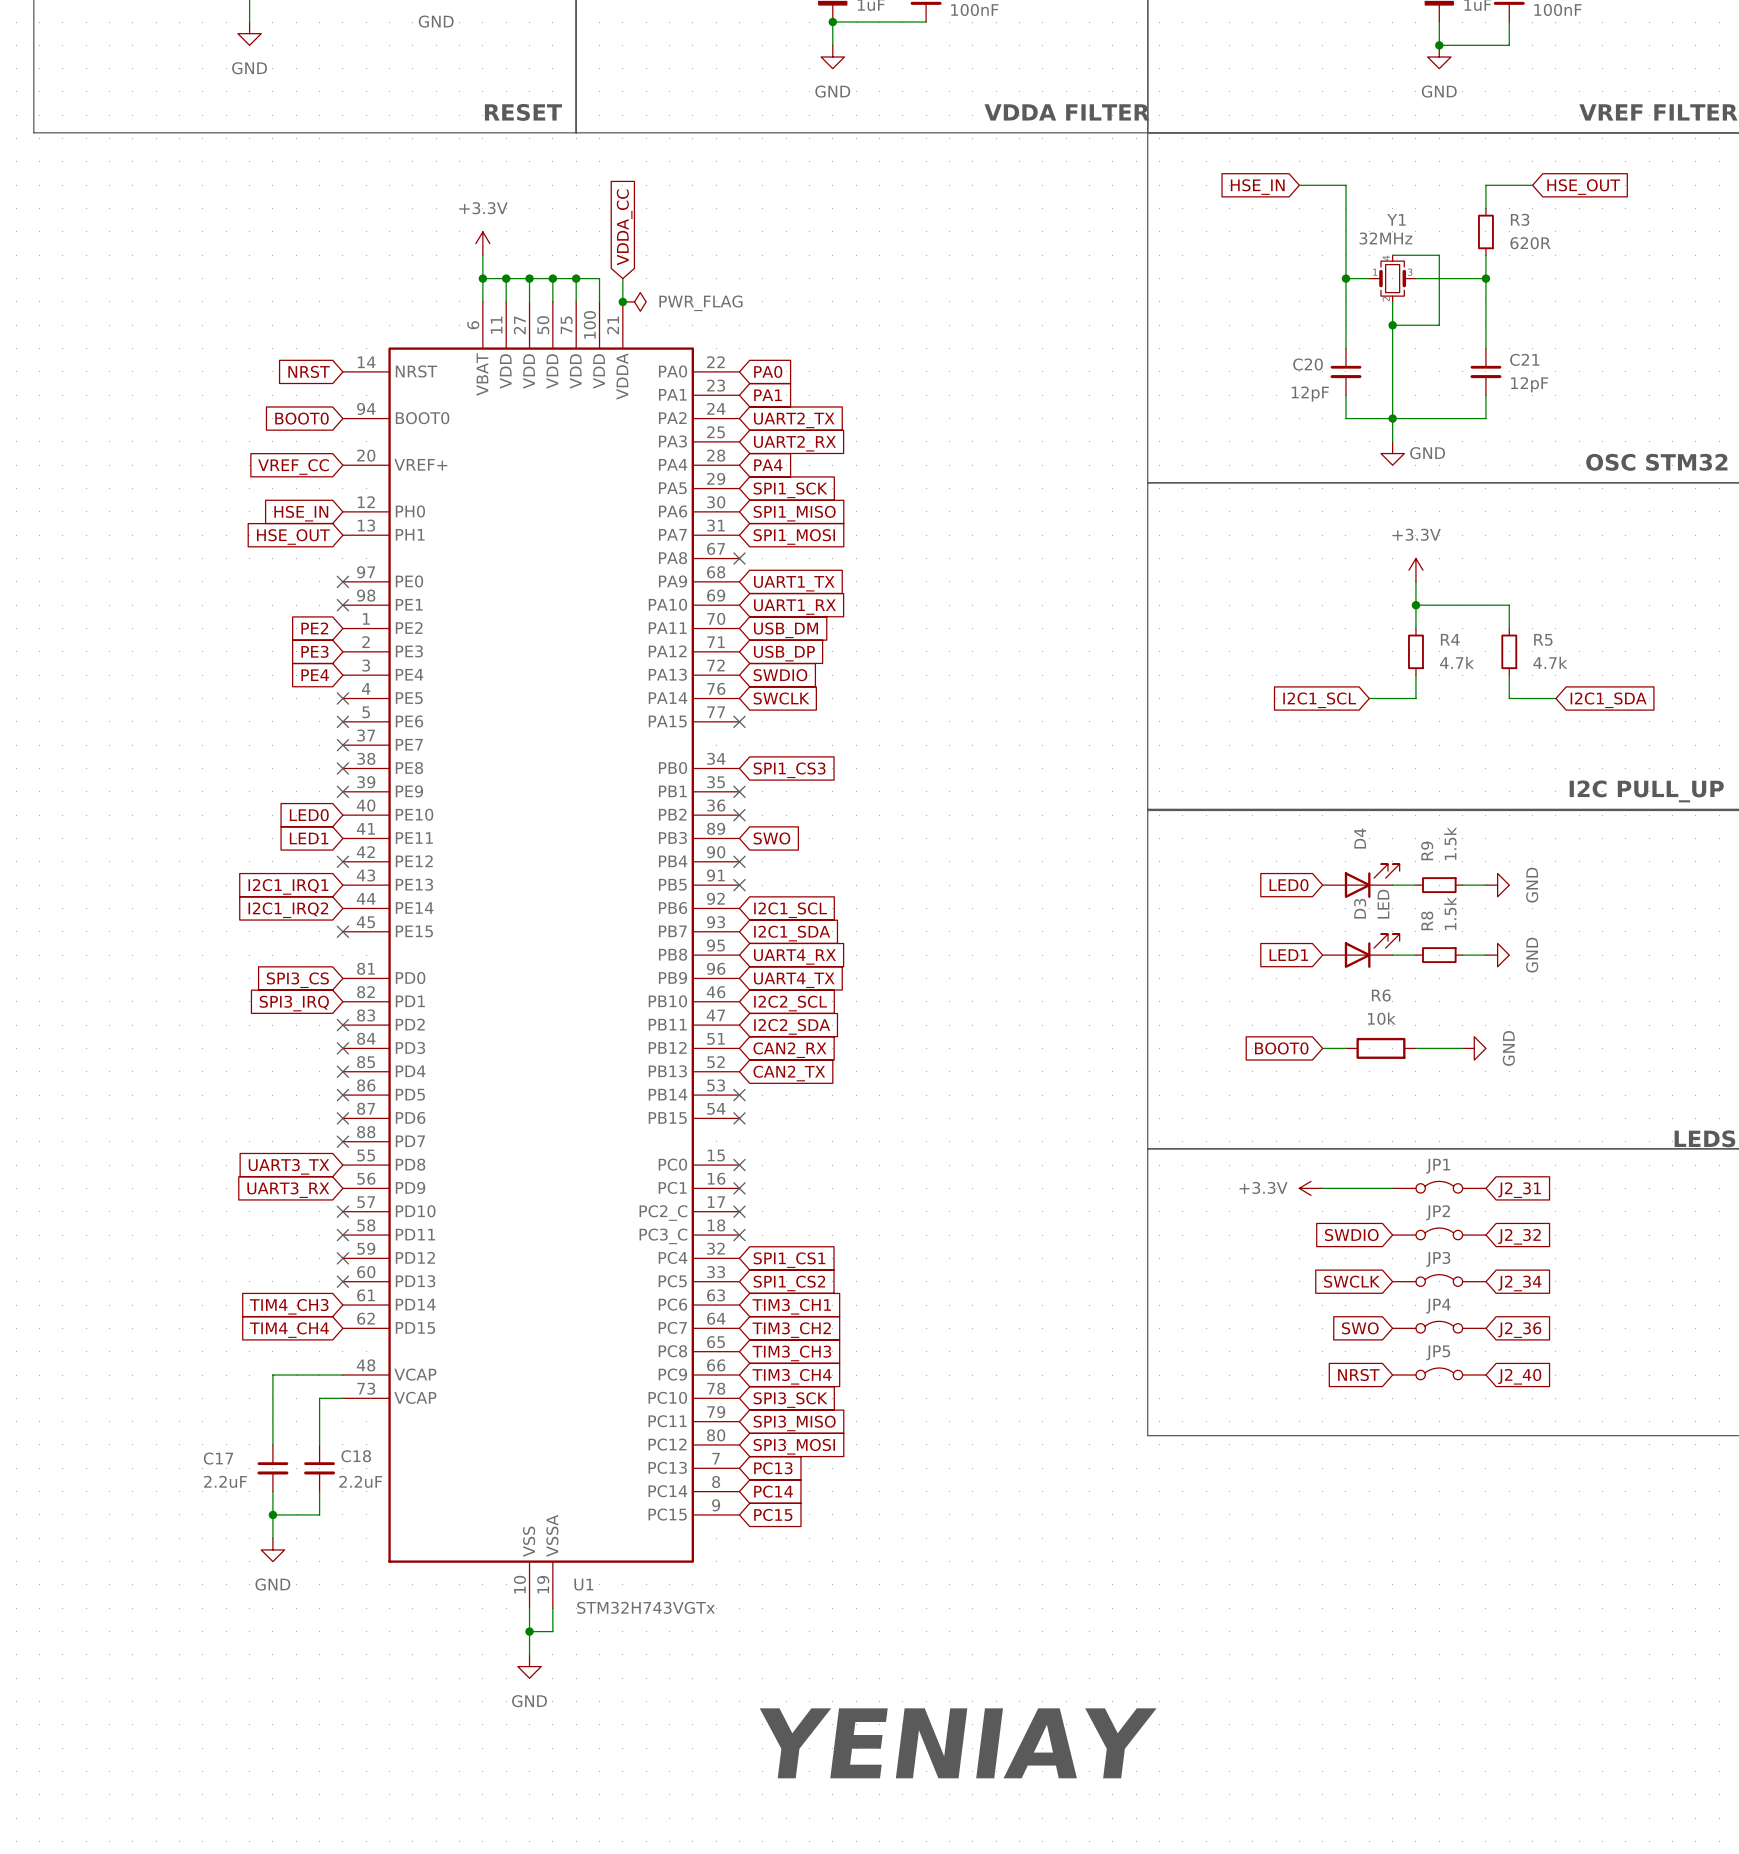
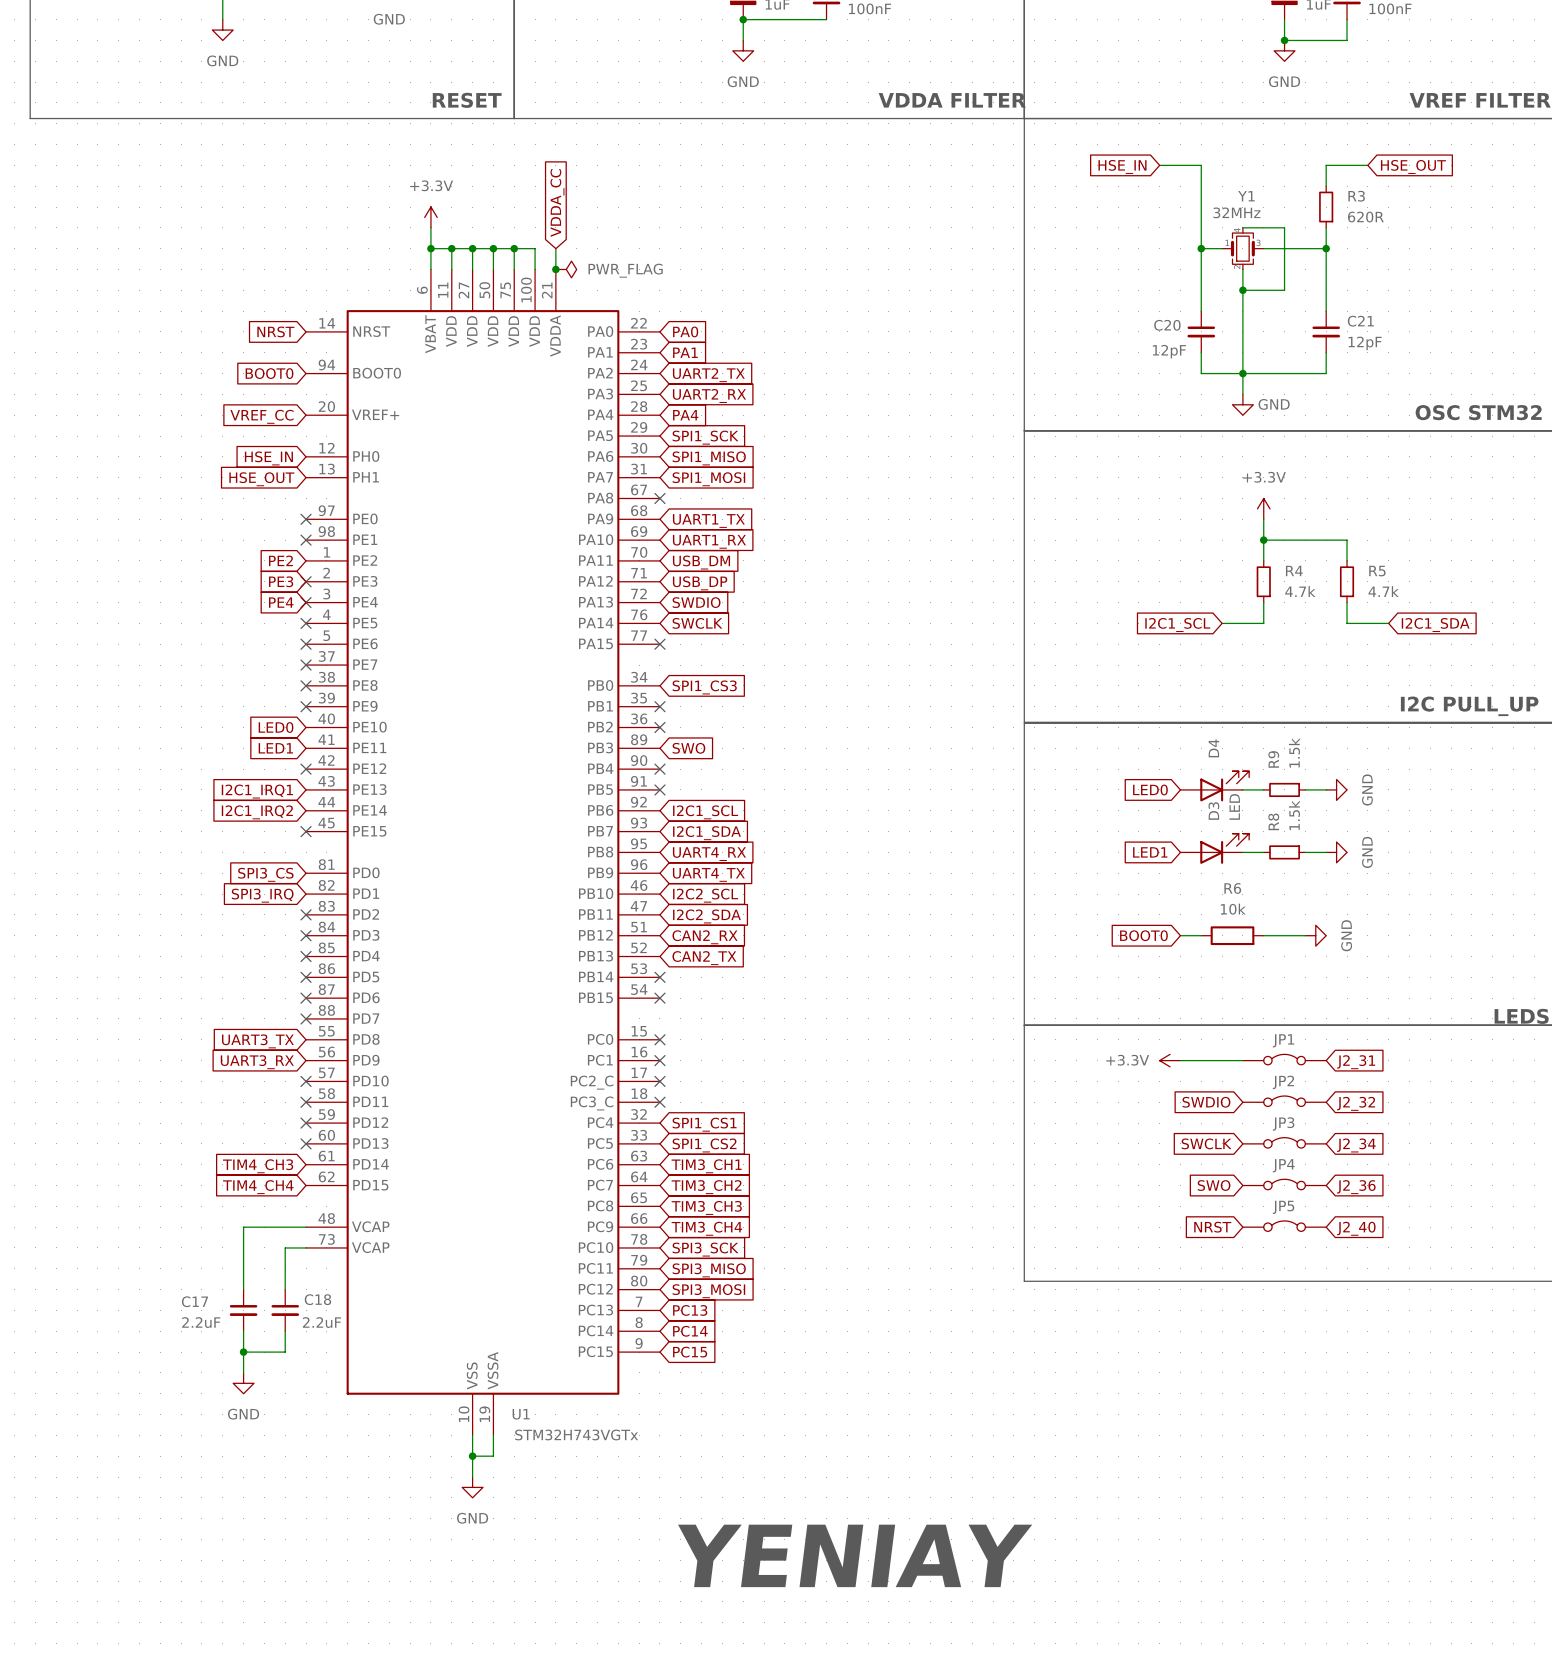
no-connect mark: none -> (306, 581)
no-connect mark: none -> (306, 602)

